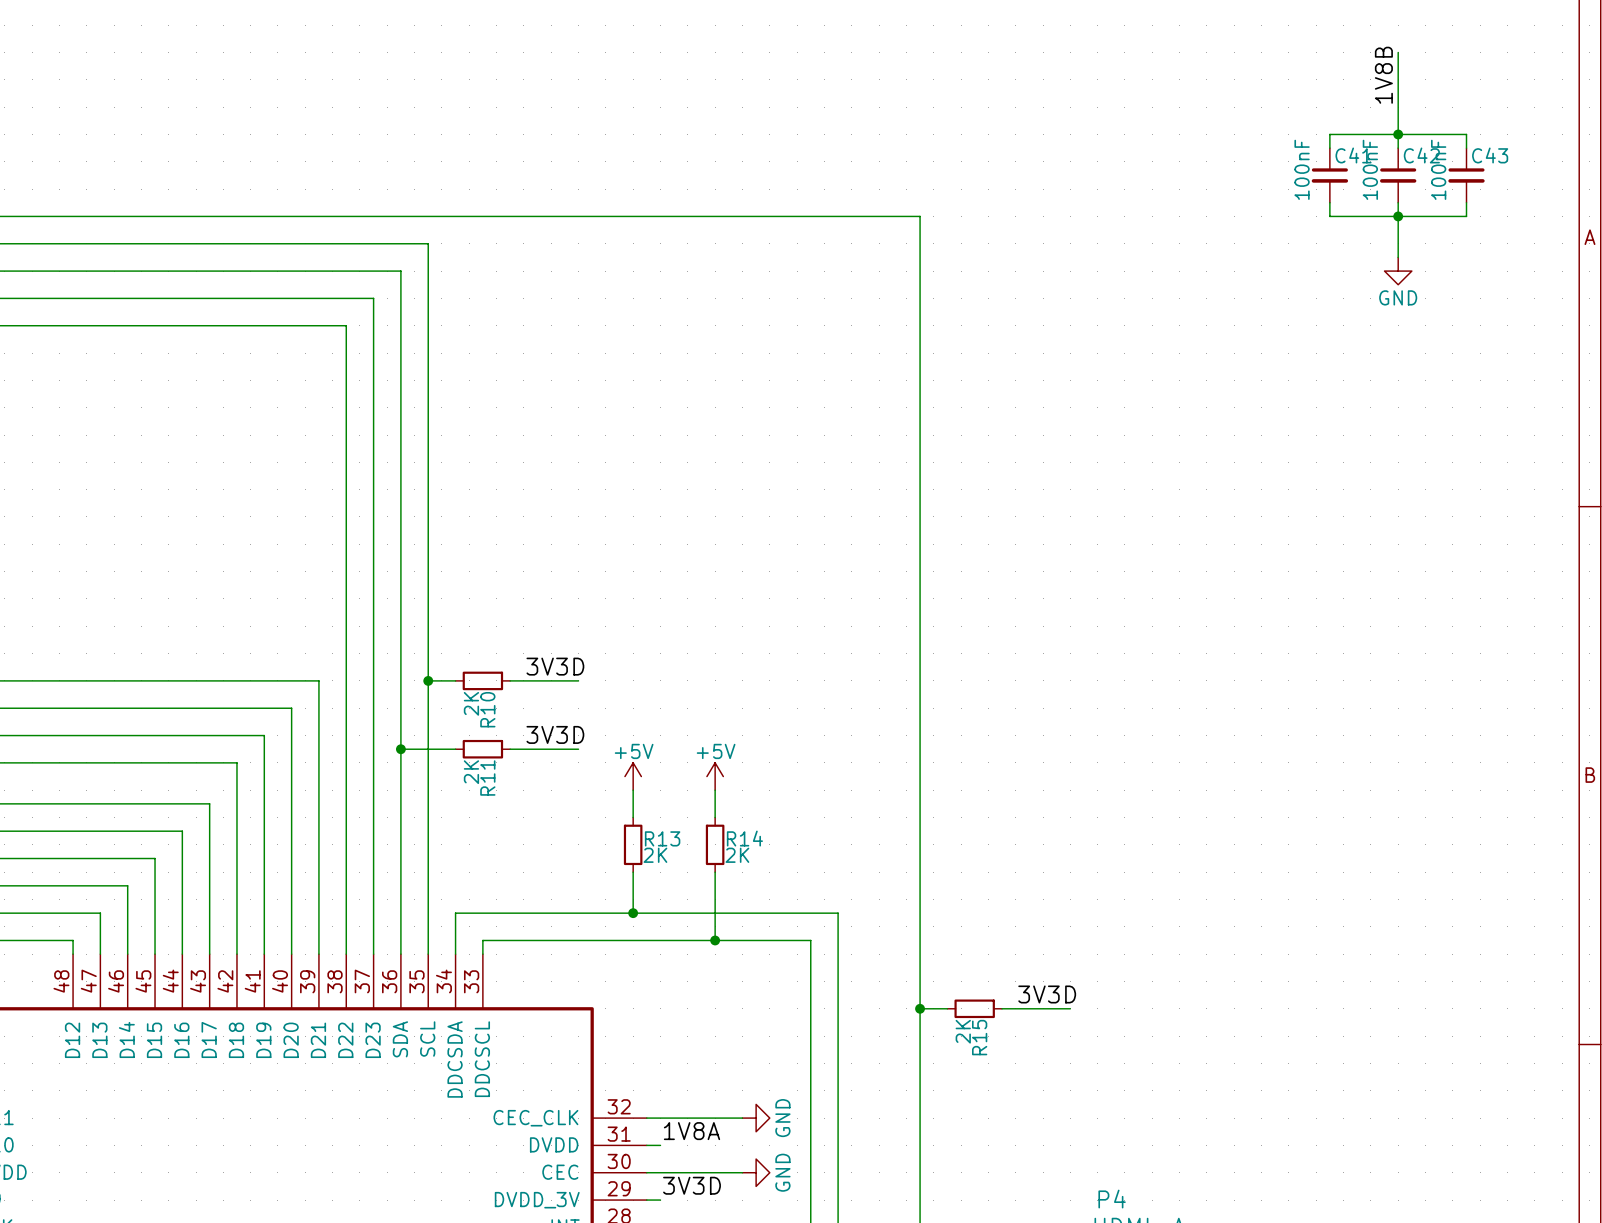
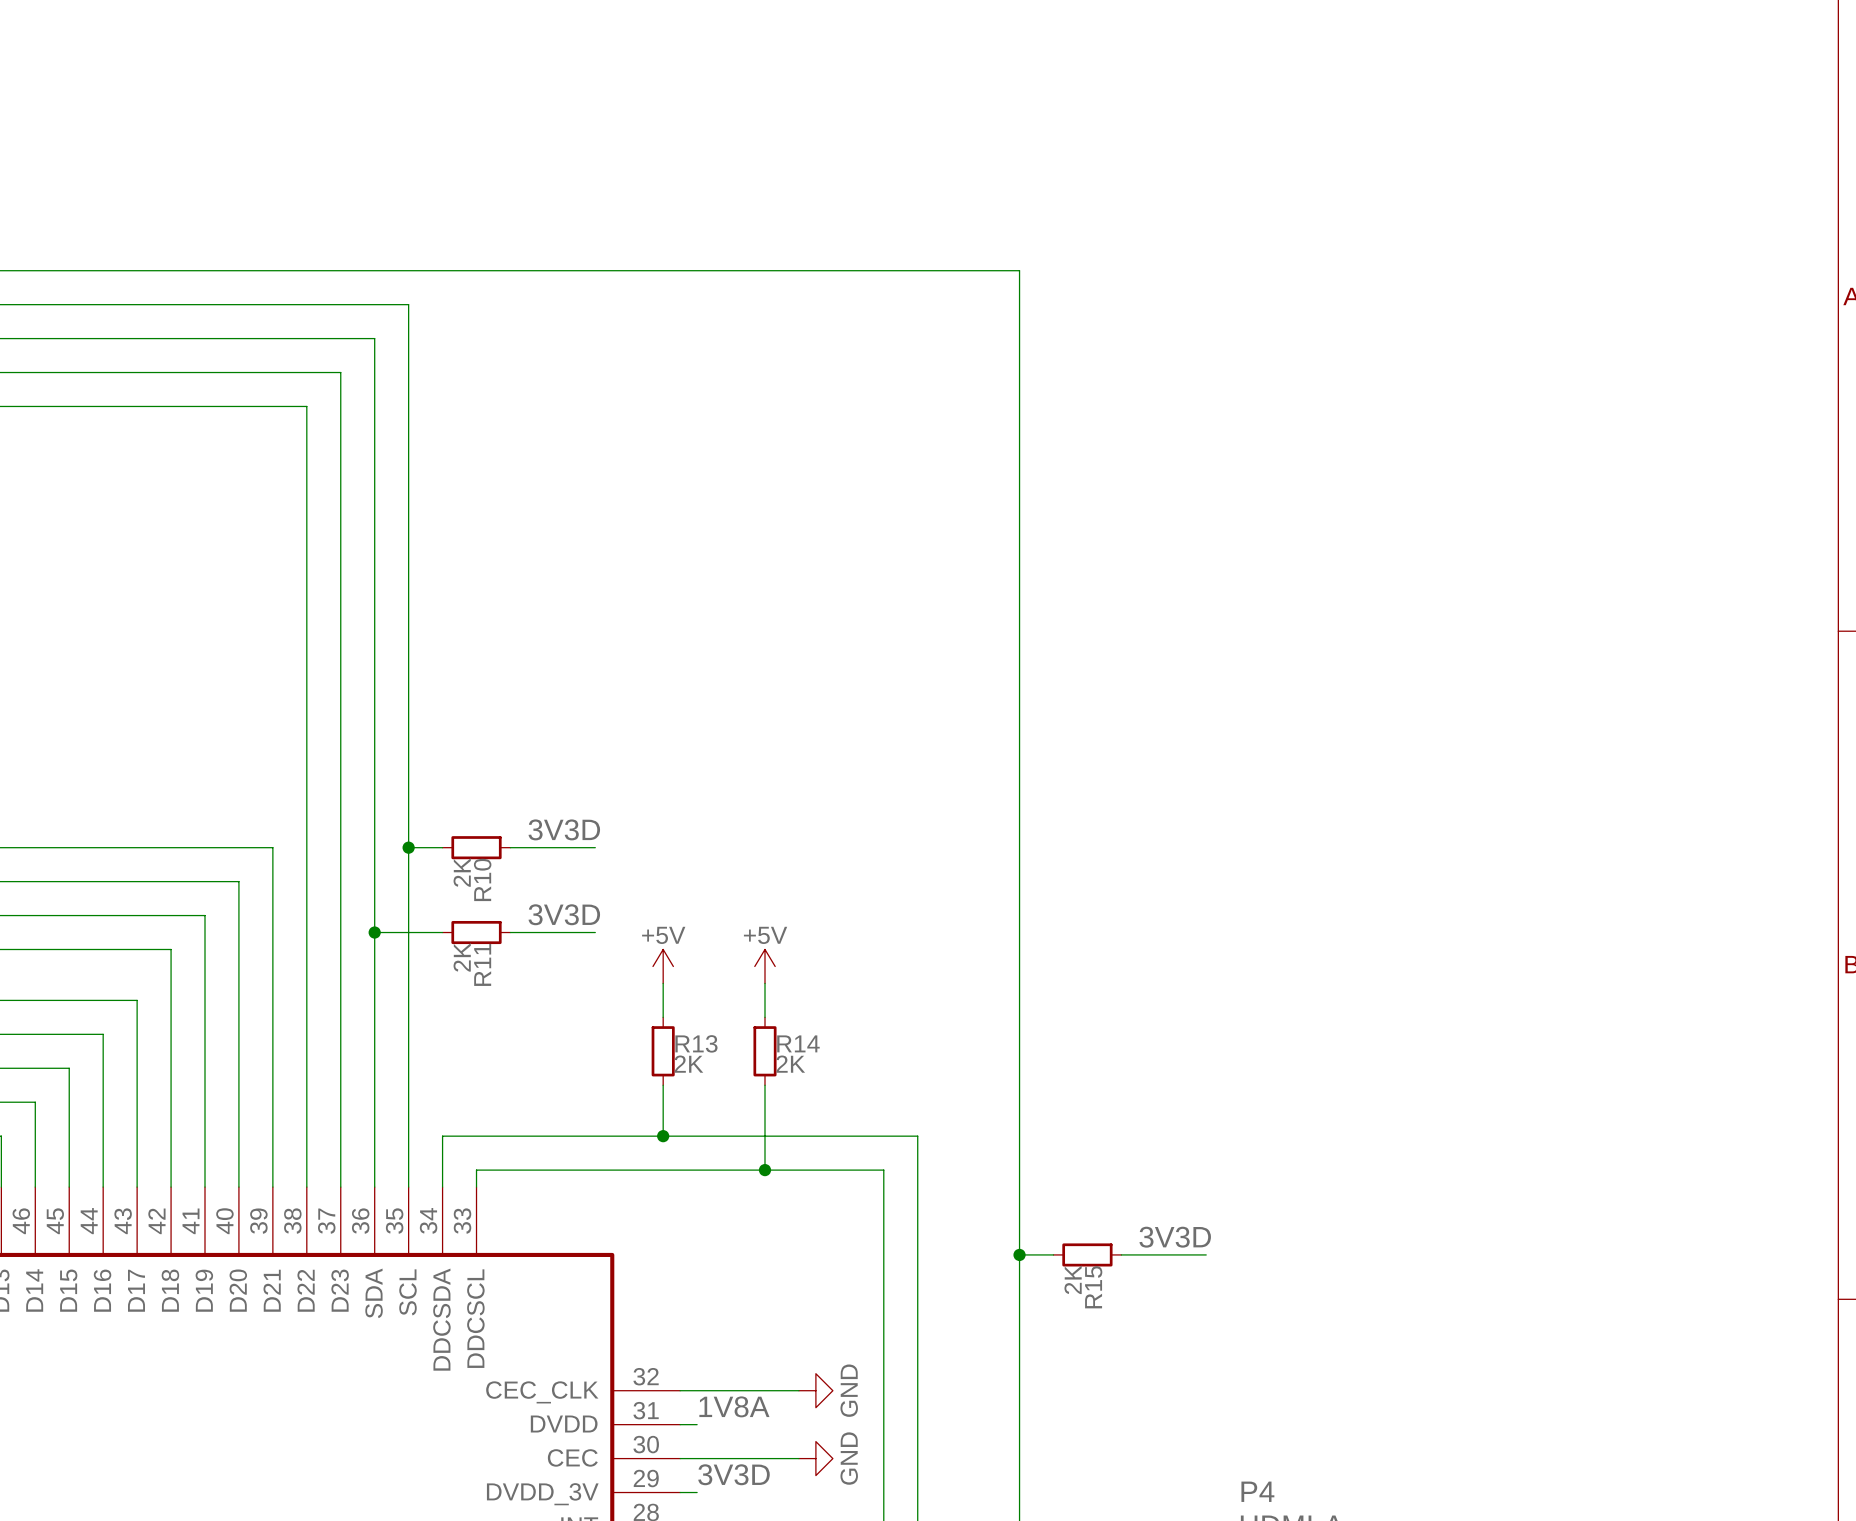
wire: (1398, 52) (1398, 148) -> none
label: 1V8B (1383, 75) -> none
junction: (1398, 134) -> none
wire: (1329, 148) (1329, 134) (1466, 134) (1466, 148) -> none
C41: 100nF (1329, 175) -> none
C42: 100nF (1398, 175) -> none
C43: 100nF (1466, 175) -> none
wire: (1329, 202) (1329, 216) (1466, 216) (1466, 202) -> none
wire: (1398, 202) (1398, 257) -> none
junction: (1398, 216) -> none
power symbol: GND (1398, 271) -> none

